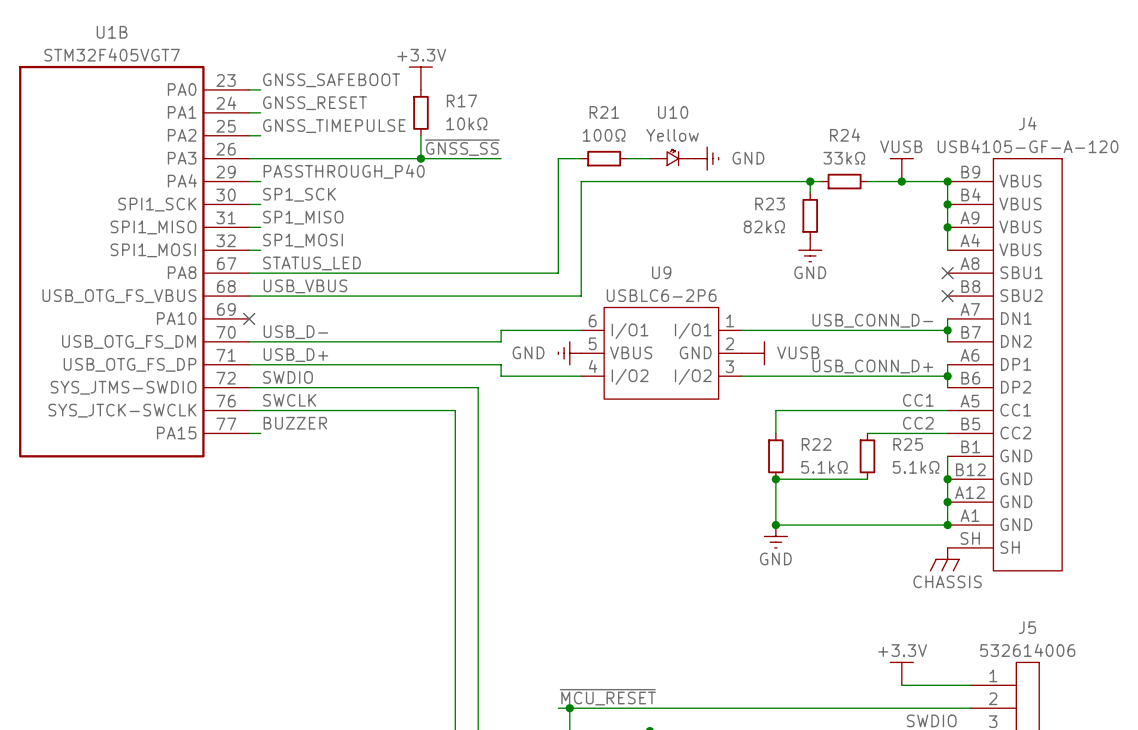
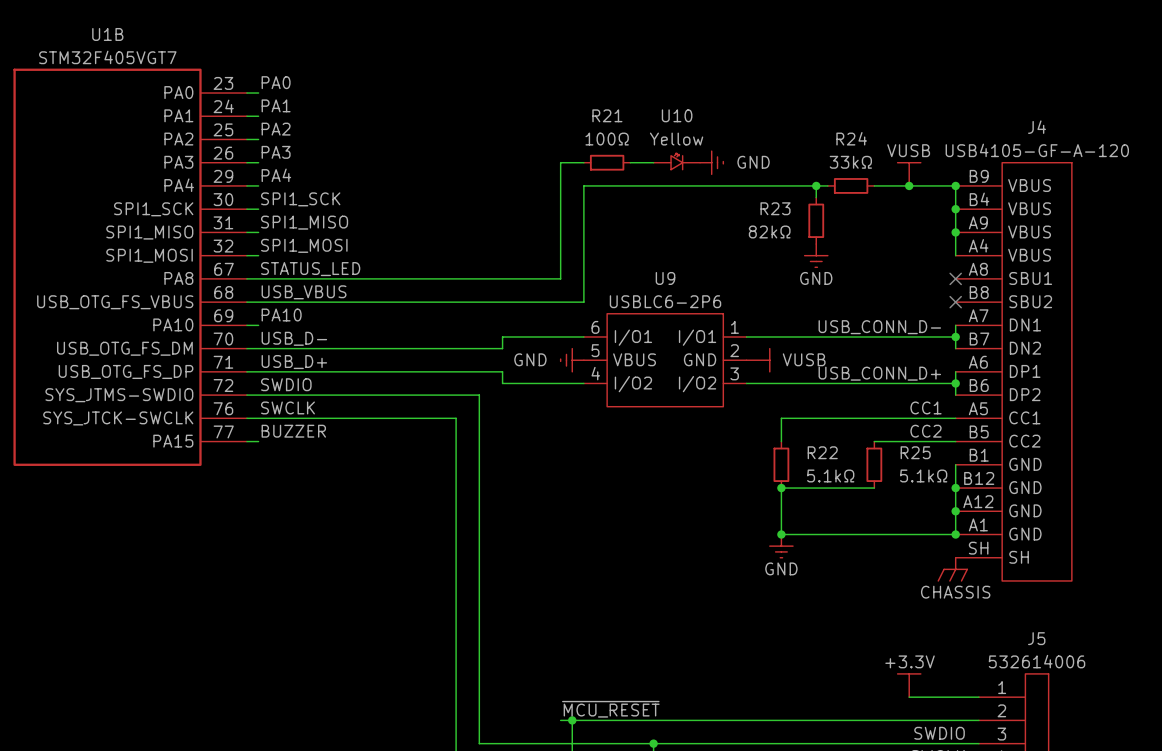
power symbol: +3.3V (420, 78) -> none
label: GNSS_SAFEBOOT (331, 80) -> PA0 (276, 82)
label: GNSS_RESET (315, 103) -> PA1 (276, 105)
R17: 10kΩ (420, 112) -> none
label: GNSS_TIMEPULSE (334, 126) -> PA2 (276, 129)
wire: (420, 135) (420, 158) -> none
label: ~{GNSS_SS} (462, 147) -> none
label: none -> PA3 (276, 152)
wire: (260, 158) (501, 158) -> none
junction: (420, 158) -> none
label: PASSTHROUGH_P40 (344, 171) -> PA4 (276, 175)
label: SP1_SCK (299, 194) -> SPI1_SCK (300, 199)
label: SP1_MISO (303, 217) -> SPI1_MISO (304, 222)
label: SP1_MOSI (303, 240) -> SPI1_MOSI (304, 245)
label: none -> PA10 (281, 315)
wire: none -> (246, 325) (258, 325)
no-connect mark: (249, 318) -> none

